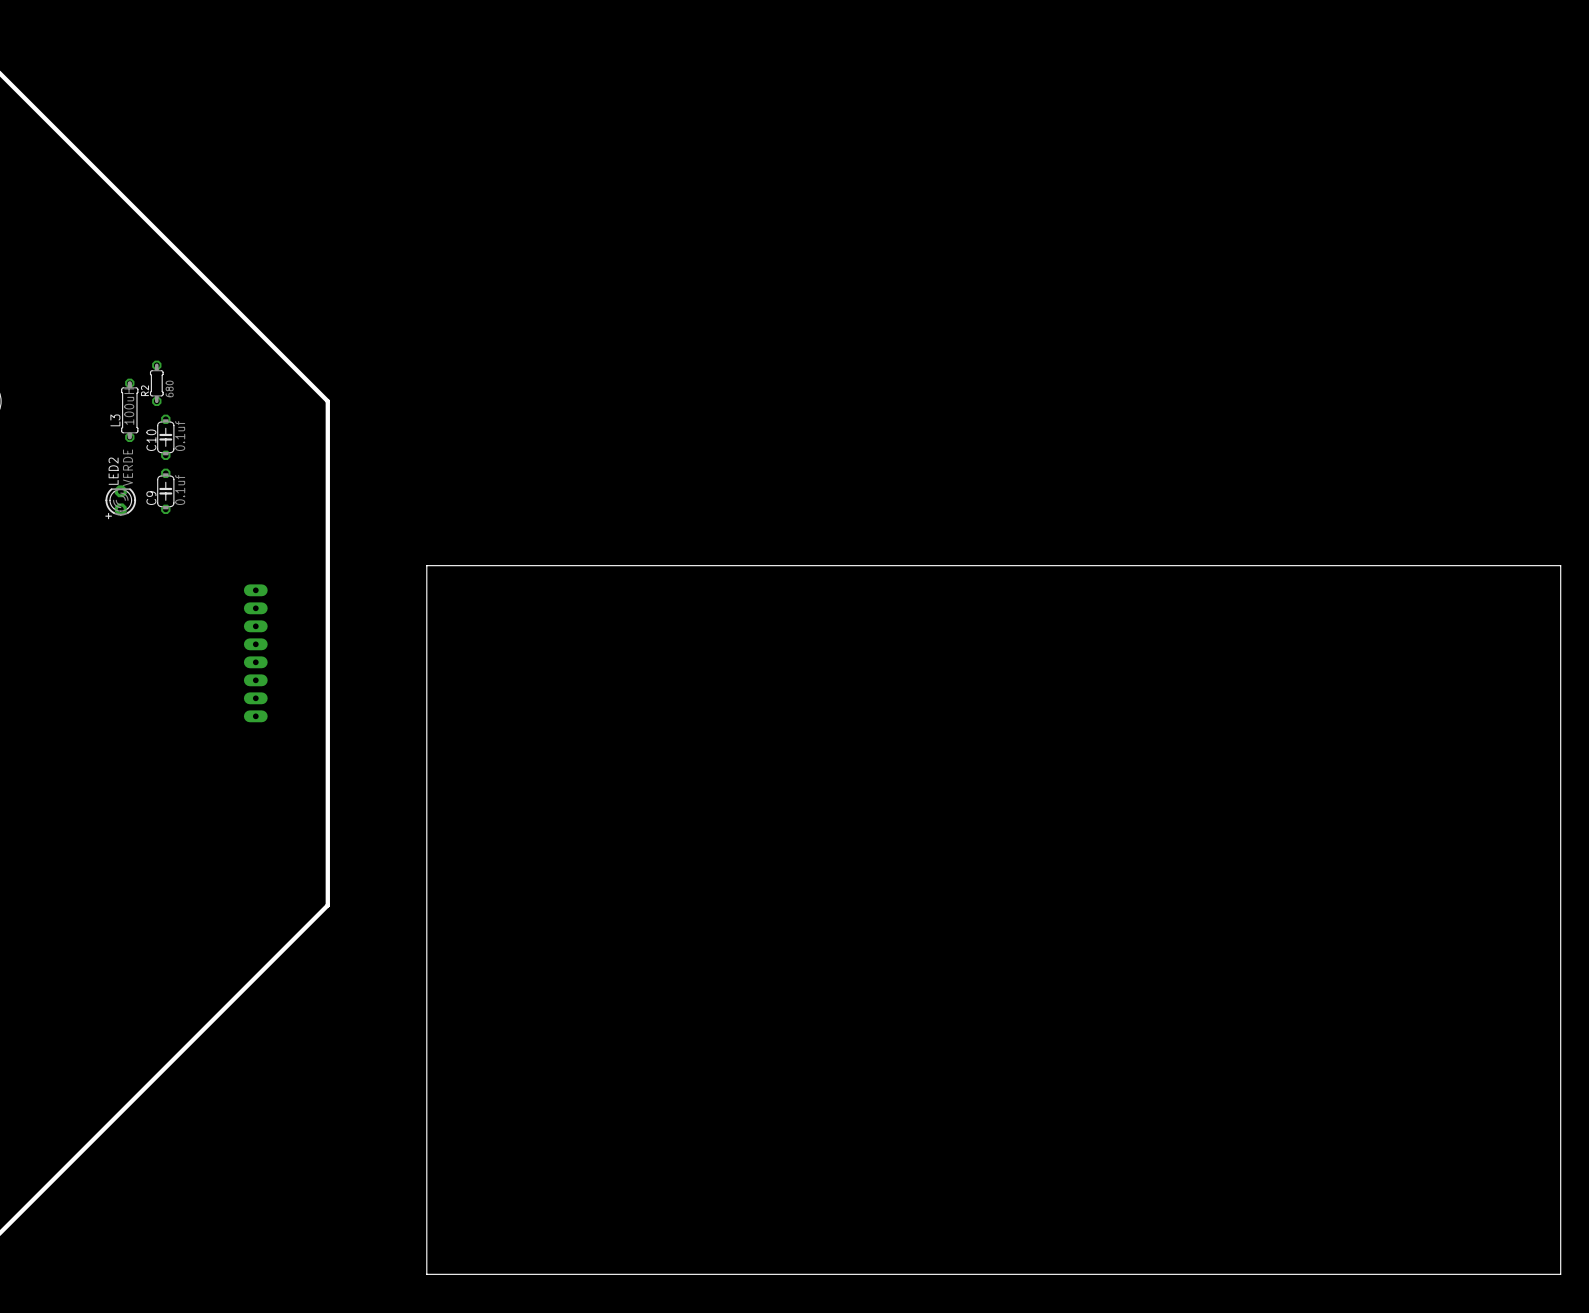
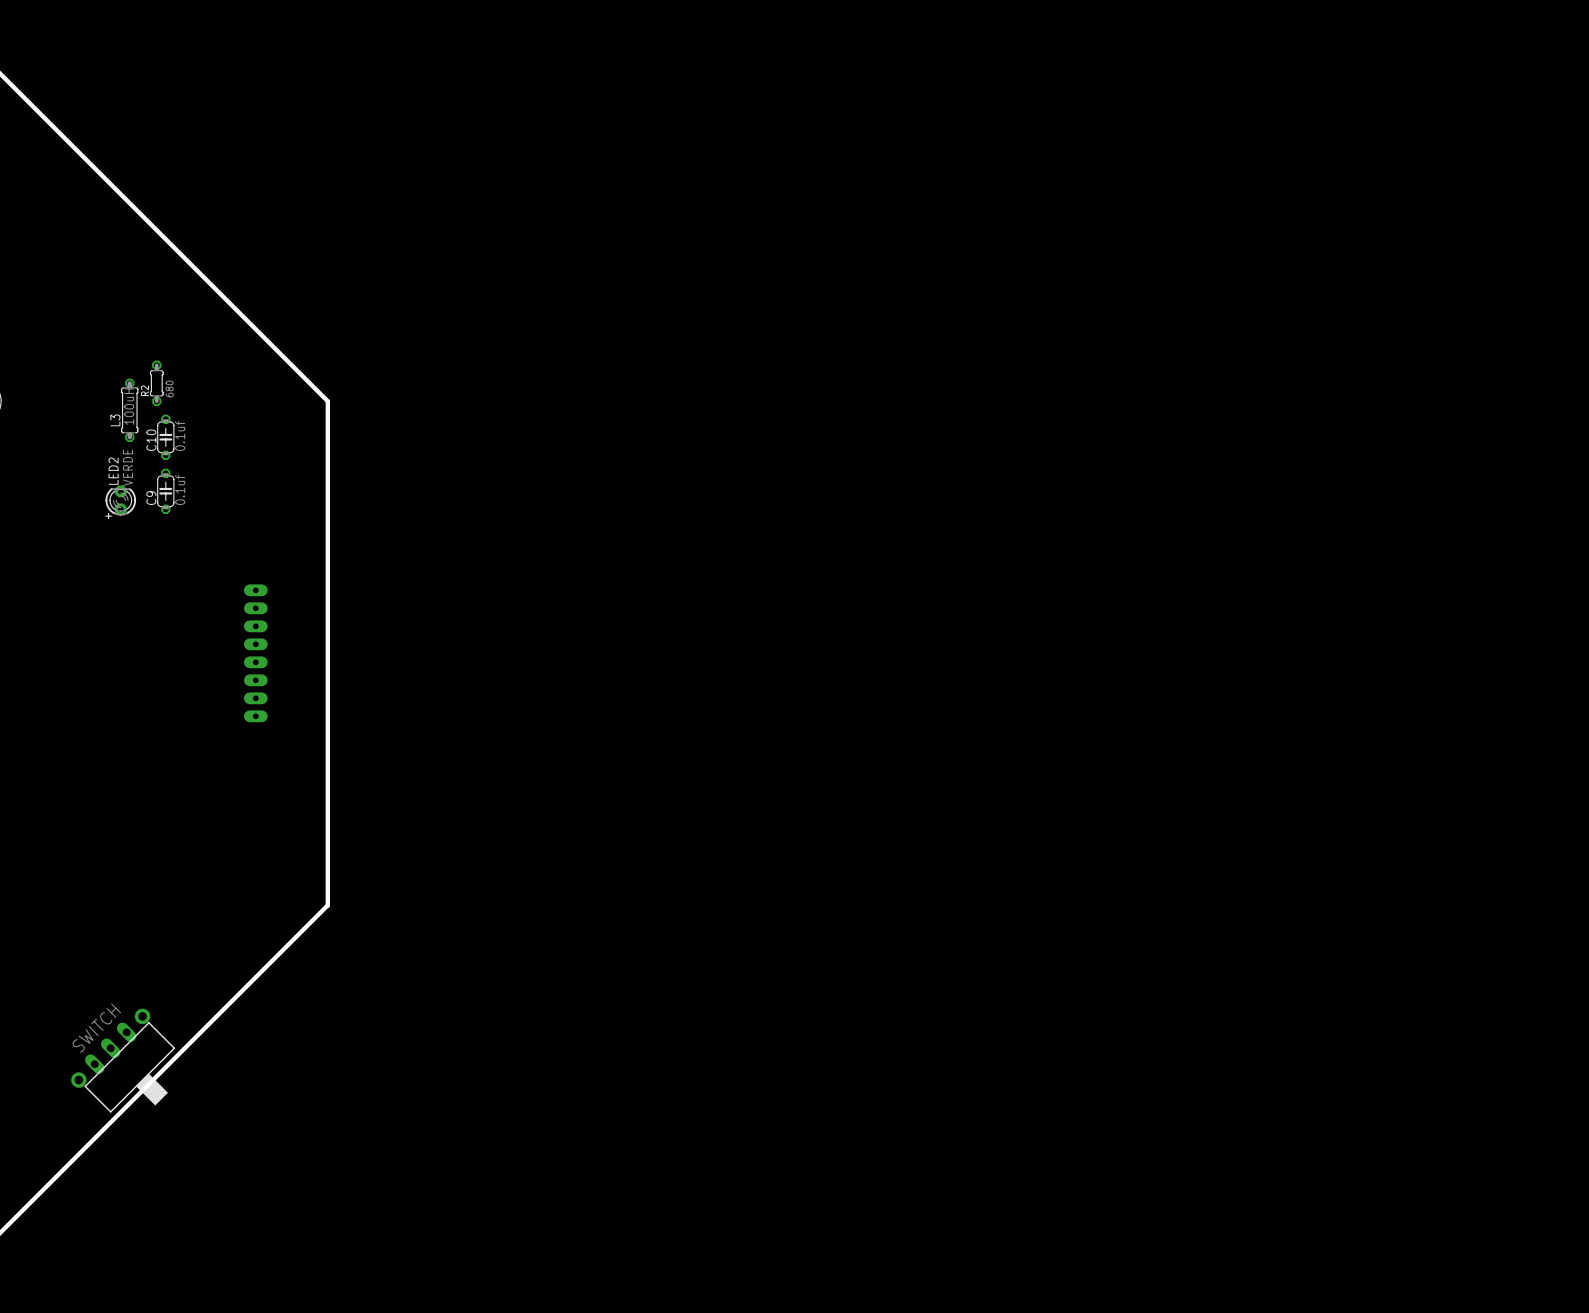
board edge: (426, 565) (1560, 565) (1560, 1274) (426, 1274) (426, 565) -> none
part: none -> SWITCH (123, 1060)

